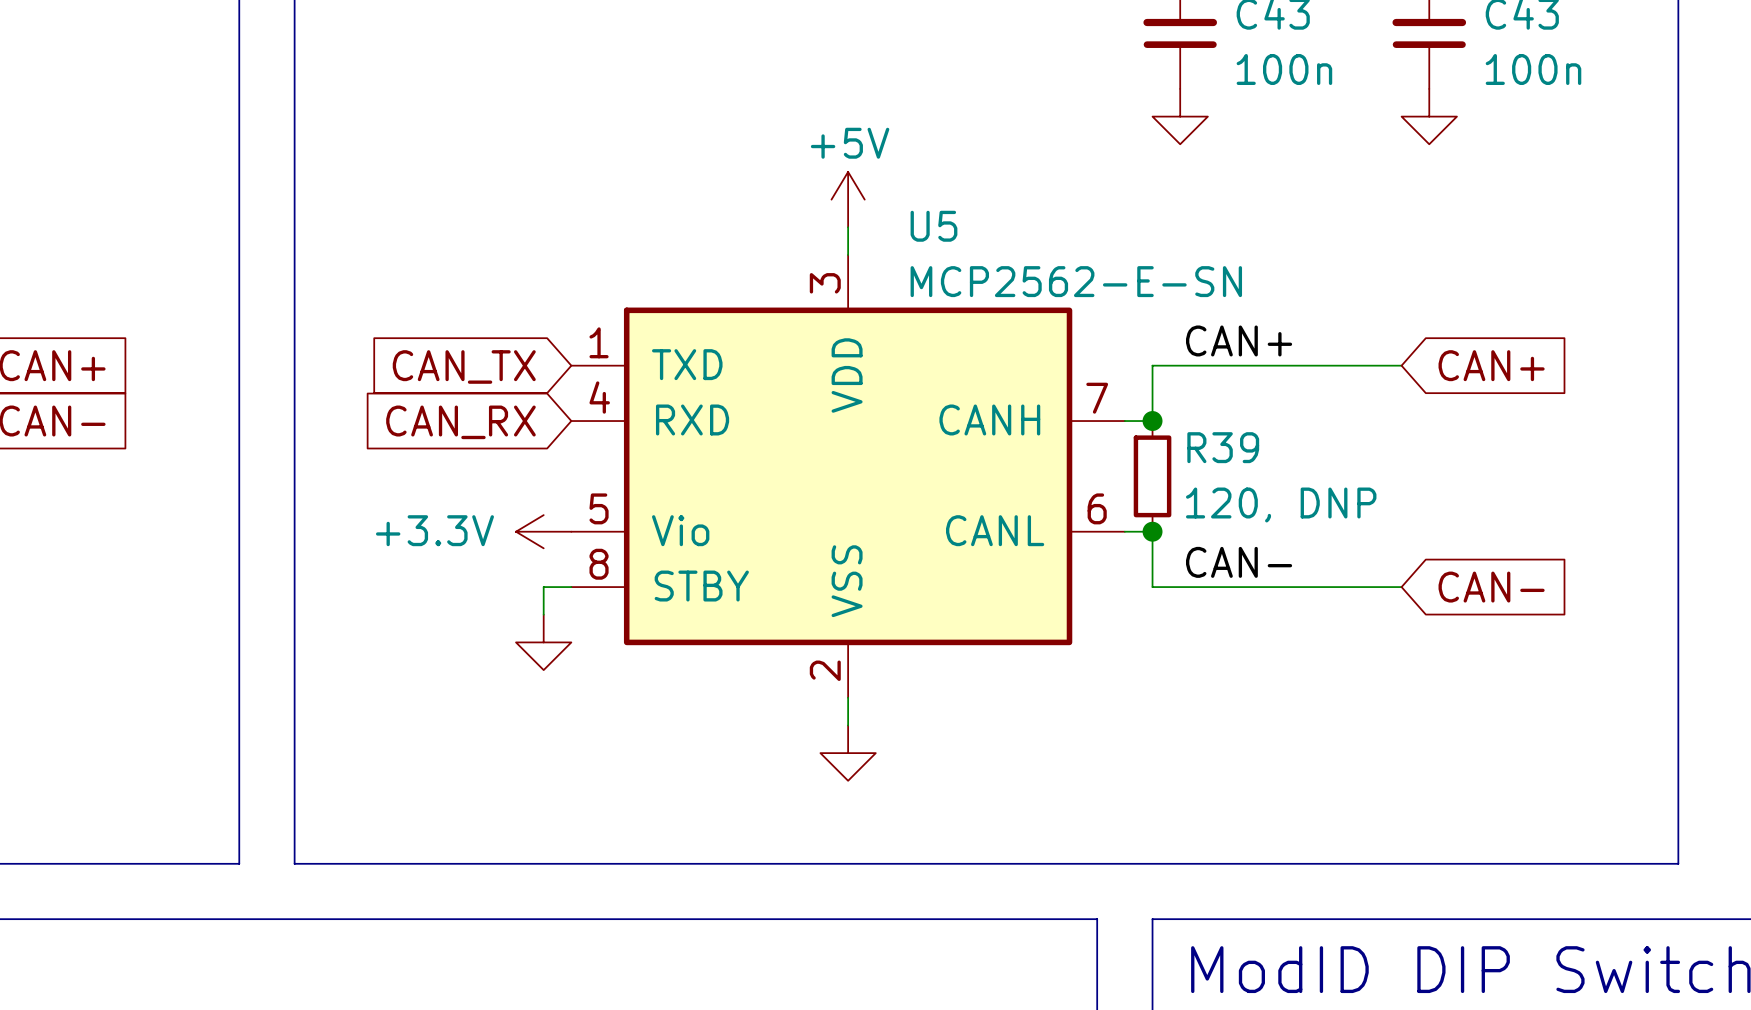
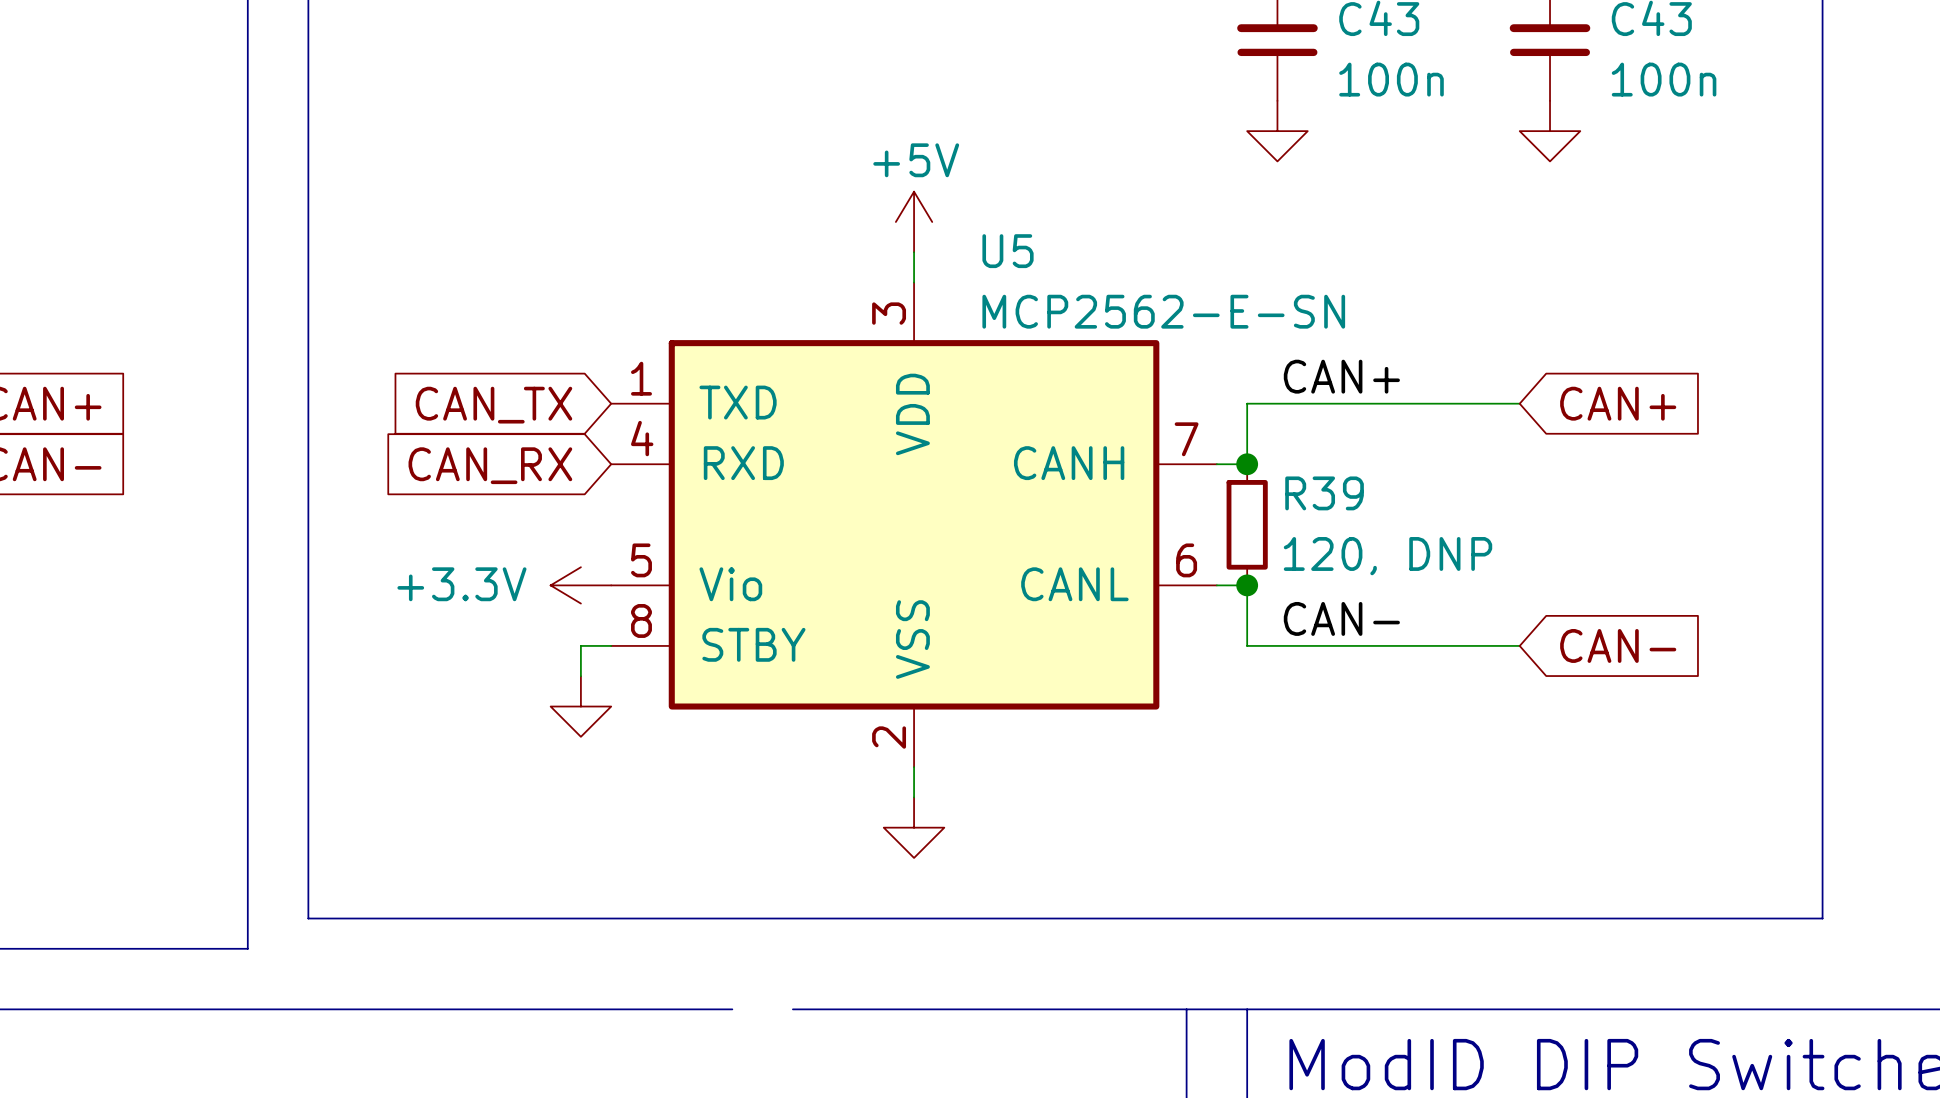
line: (294, 836) (294, 863) (1678, 863) (1678, 836) -> (308, 918) (1822, 918)
line: (682, 919) (737, 919) -> (1186, 1009) (1247, 1009)

